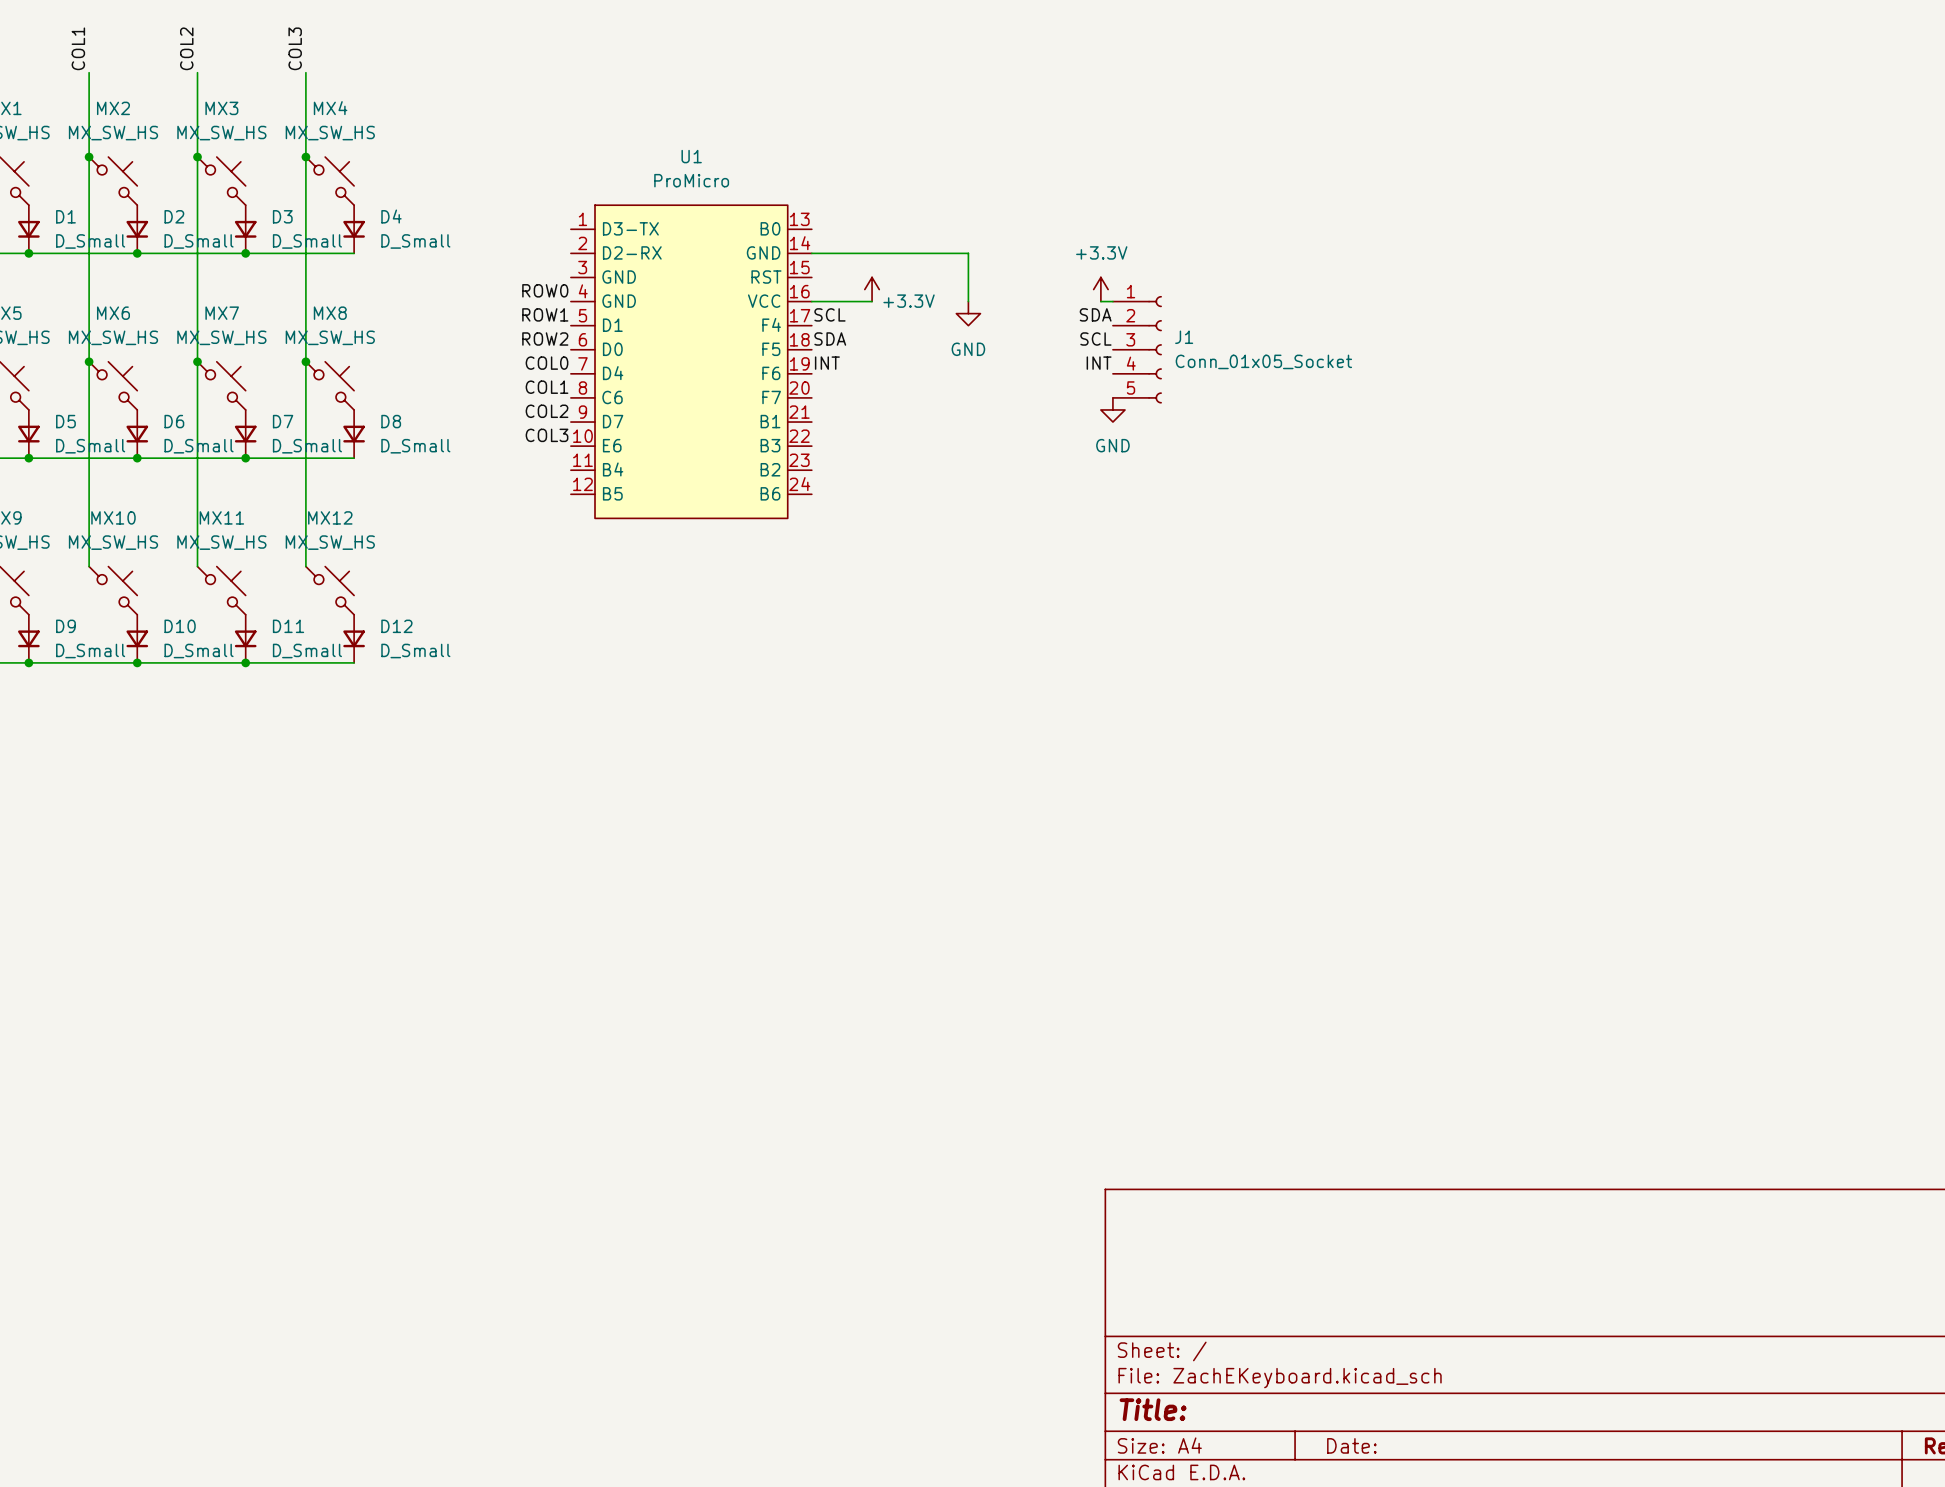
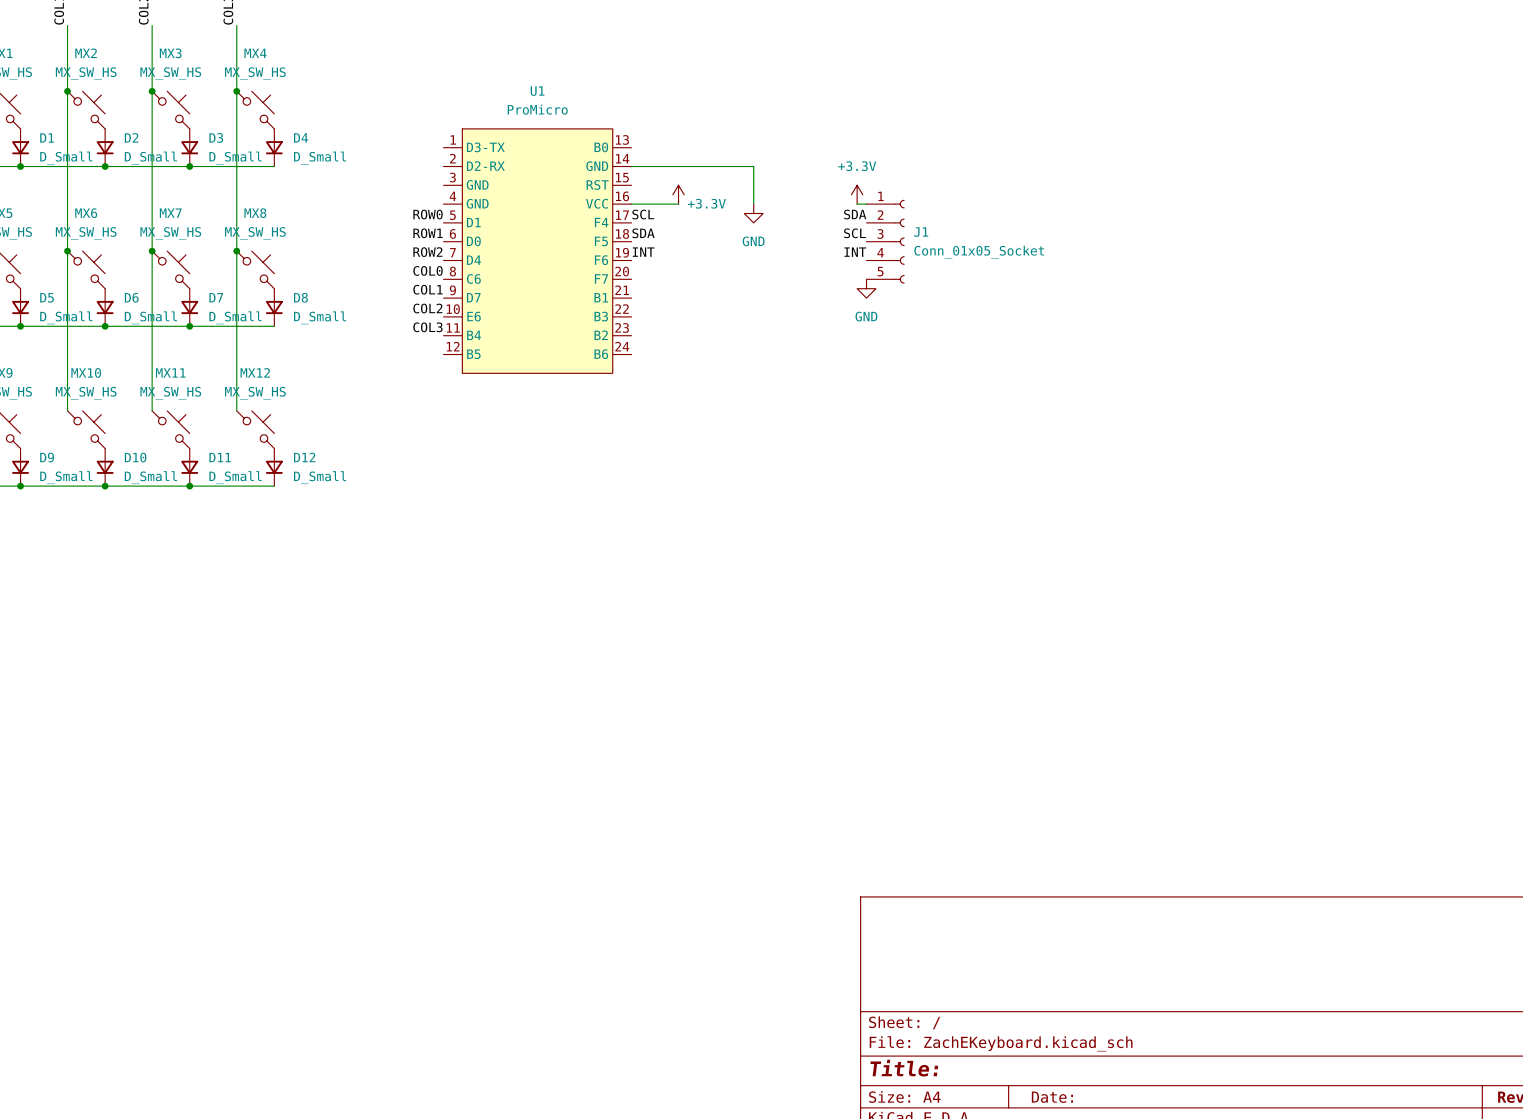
label: ROW0 (545, 290) -> none
label: ROW1 (545, 314) -> ROW0 (428, 214)
label: ROW2 (545, 339) -> ROW1 (428, 233)
label: COL0 (547, 363) -> ROW2 (427, 252)
label: COL1 (547, 387) -> COL0 (428, 270)
label: COL2 (547, 411) -> COL1 (428, 289)
label: COL3 (547, 435) -> COL2 (427, 308)
label: none -> COL3 (427, 327)

